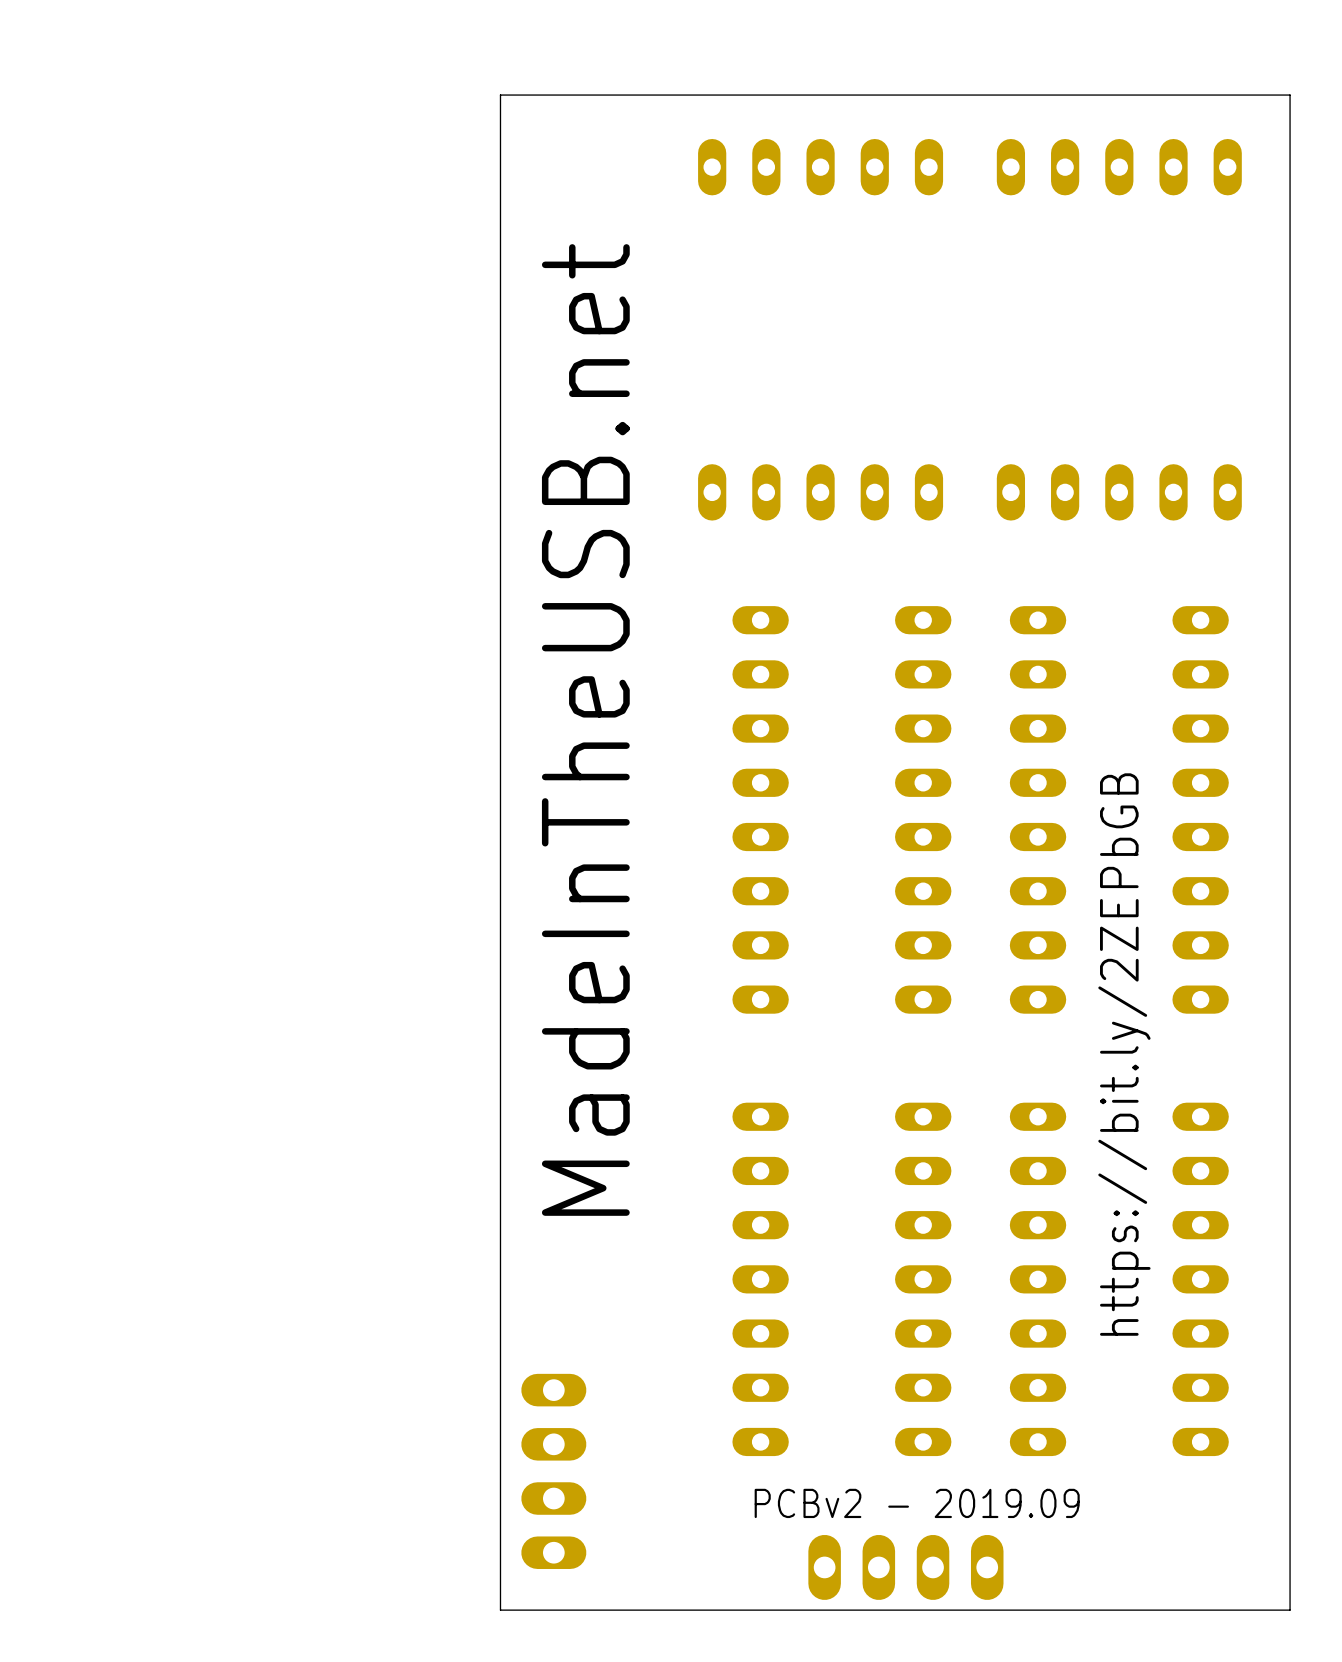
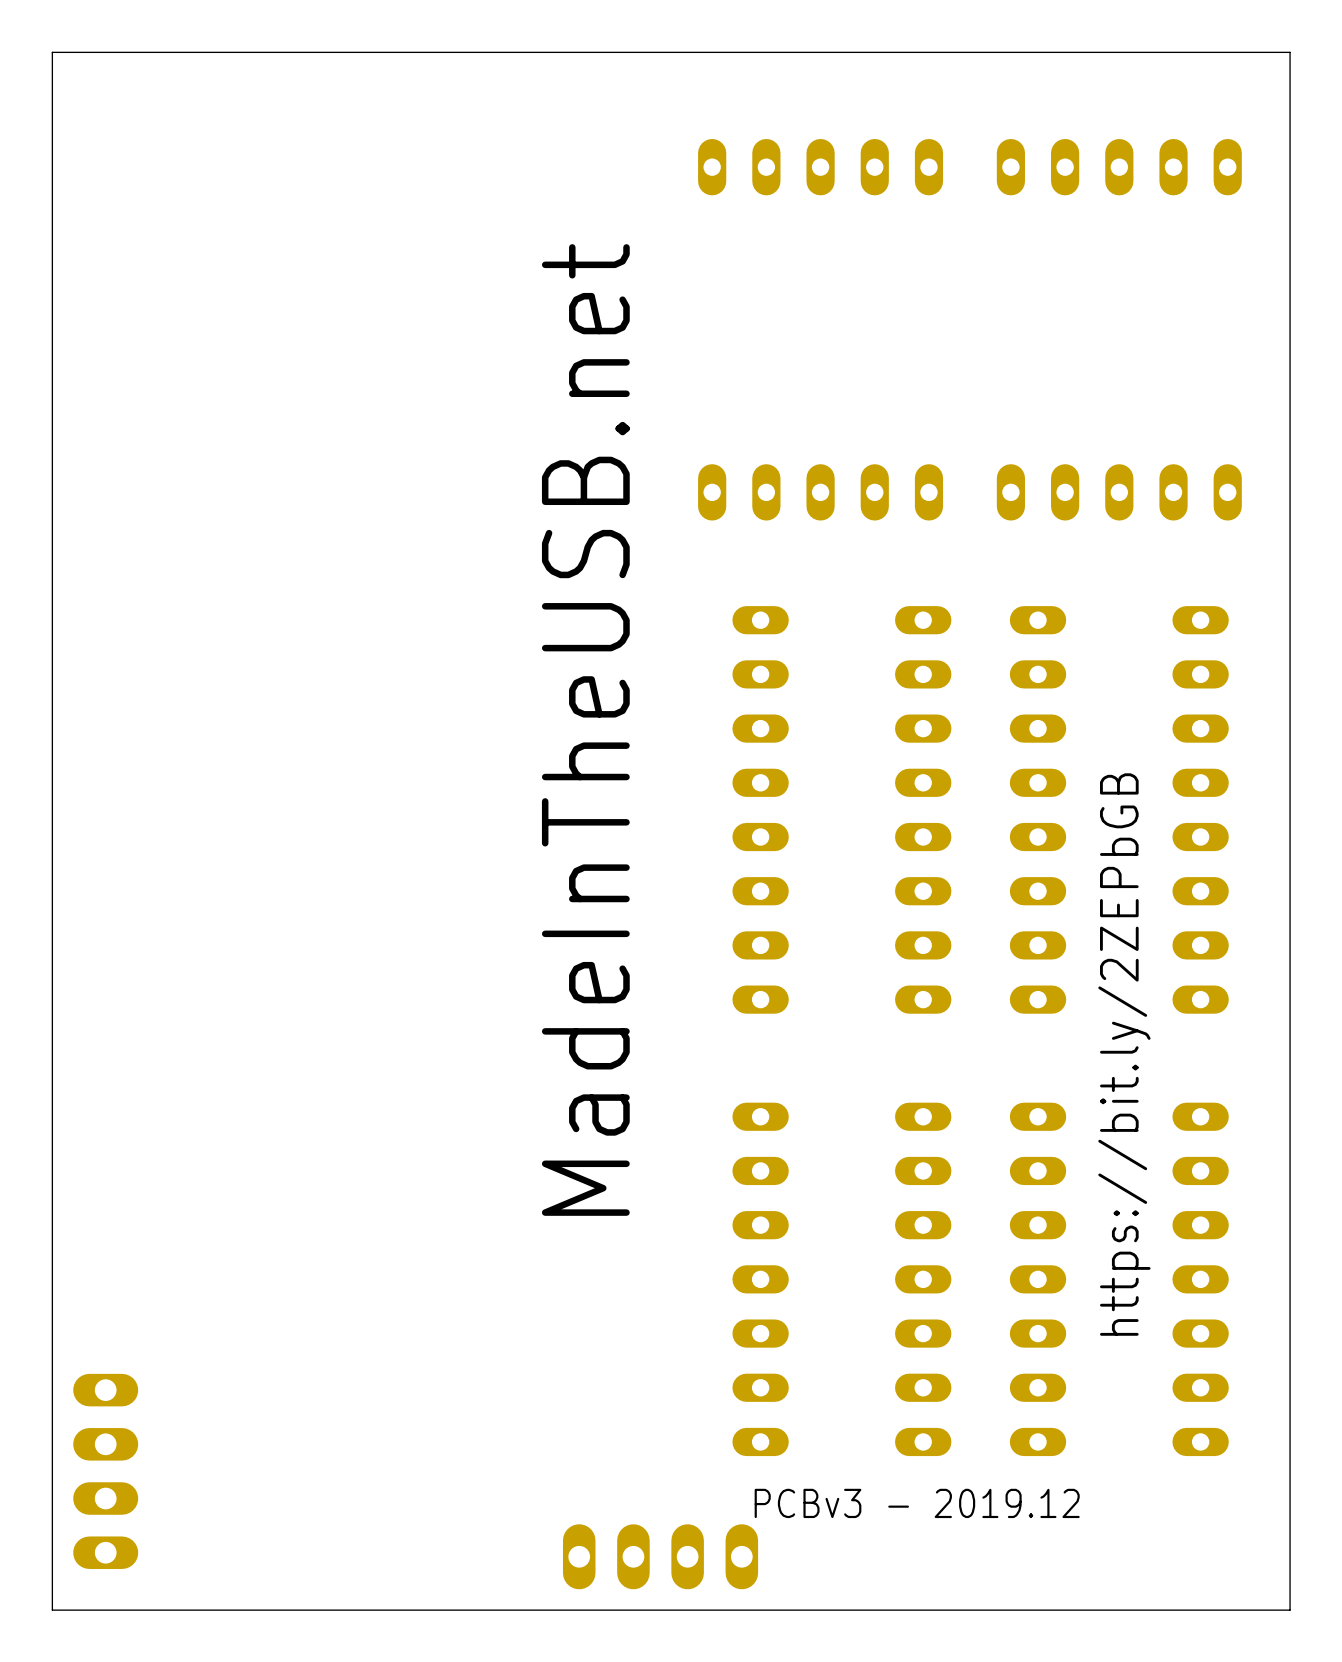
board edge: (1290, 95) (500, 95) (500, 1610) -> (1290, 95) (1290, 52) (52, 52) (52, 1610) (500, 1610)
part: none -> (105, 1471)
part: (553, 1471) -> none
text: PCBv2 - 2019.09 (917, 1503) -> PCBv3 - 2019.12 (917, 1503)
part: none -> (660, 1556)
part: (905, 1567) -> none

